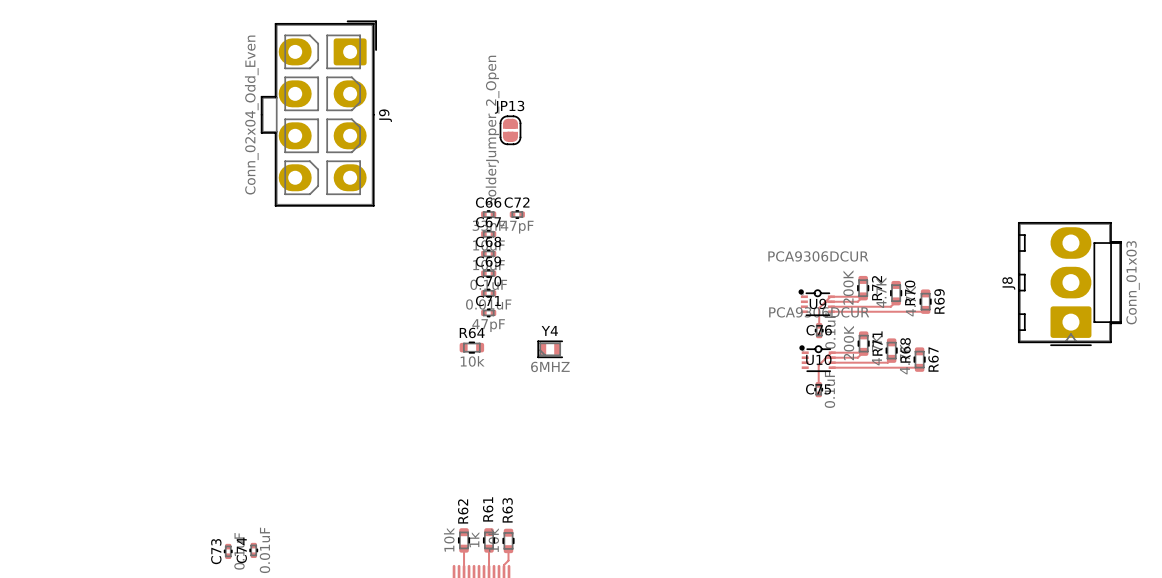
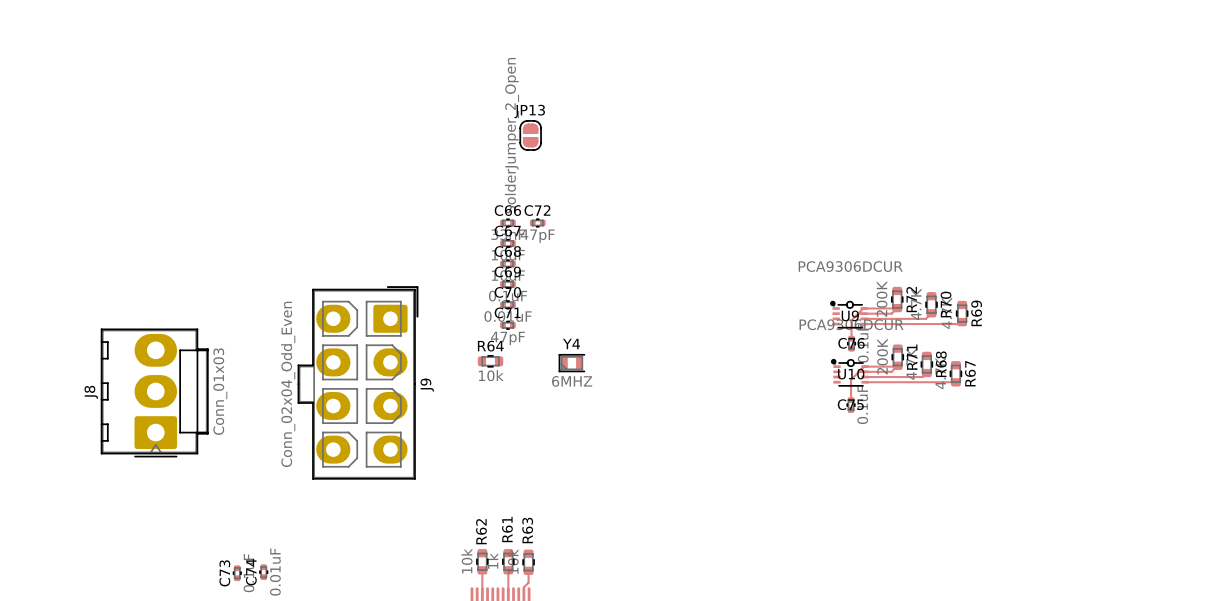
J9 position: (318, 113) -> (357, 382)
J8 position: (1069, 284) -> (154, 392)

